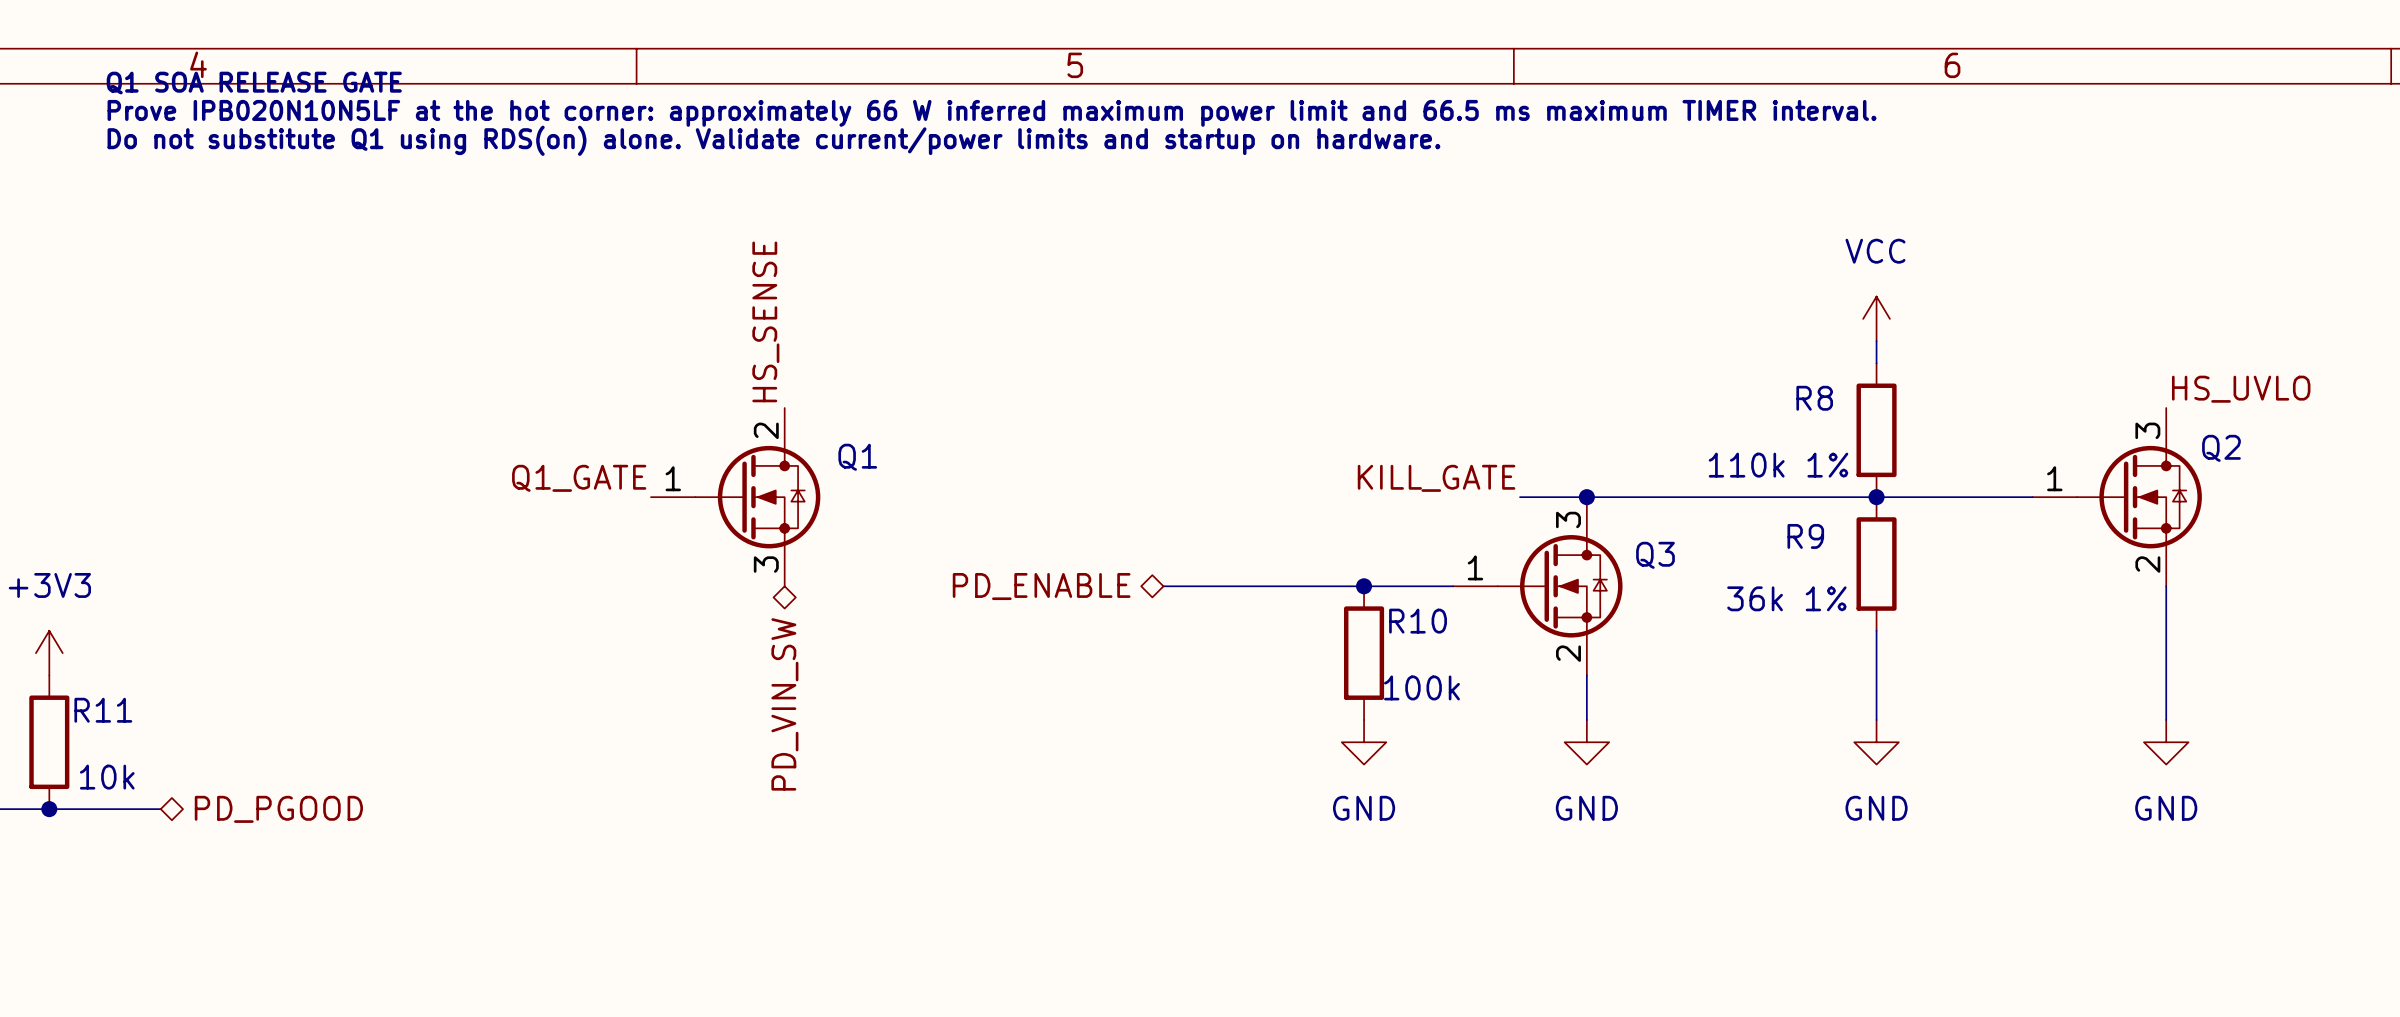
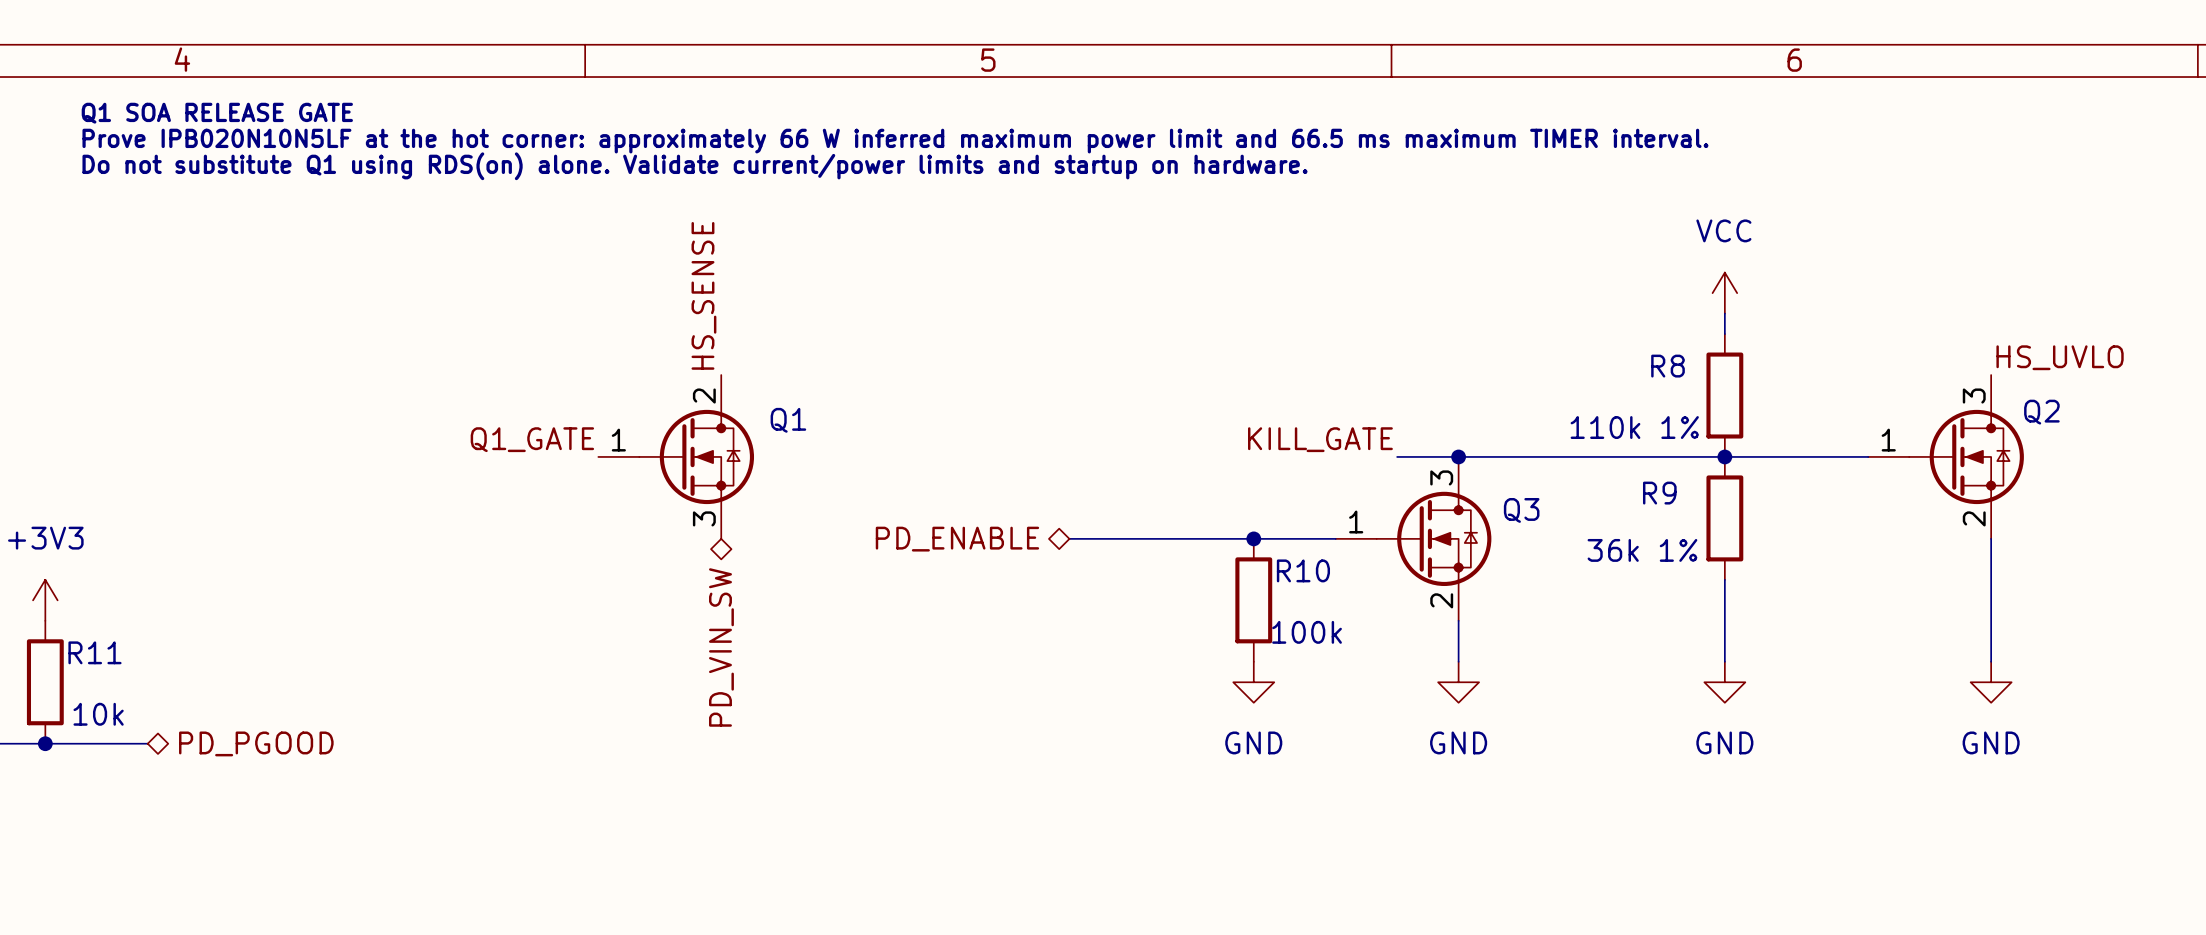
text position: Q1 SOA RELEASE GATE (254, 83) -> Q1 SOA RELEASE GATE (217, 113)
text position: Prove IPB020N10N5LF at the hot corner: approximately 66 W inferred maximum power limit and 66.5 ms maximum TIMER interval. (992, 113) -> Prove IPB020N10N5LF at the hot corner: approximately 66 W inferred maximum power limit and 66.5 ms maximum TIMER interval. (895, 141)
text position: Do not substitute Q1 using RDS(on) alone. Validate current/power limits and startup on hardware. (773, 140) -> Do not substitute Q1 using RDS(on) alone. Validate current/power limits and startup on hardware. (695, 166)

